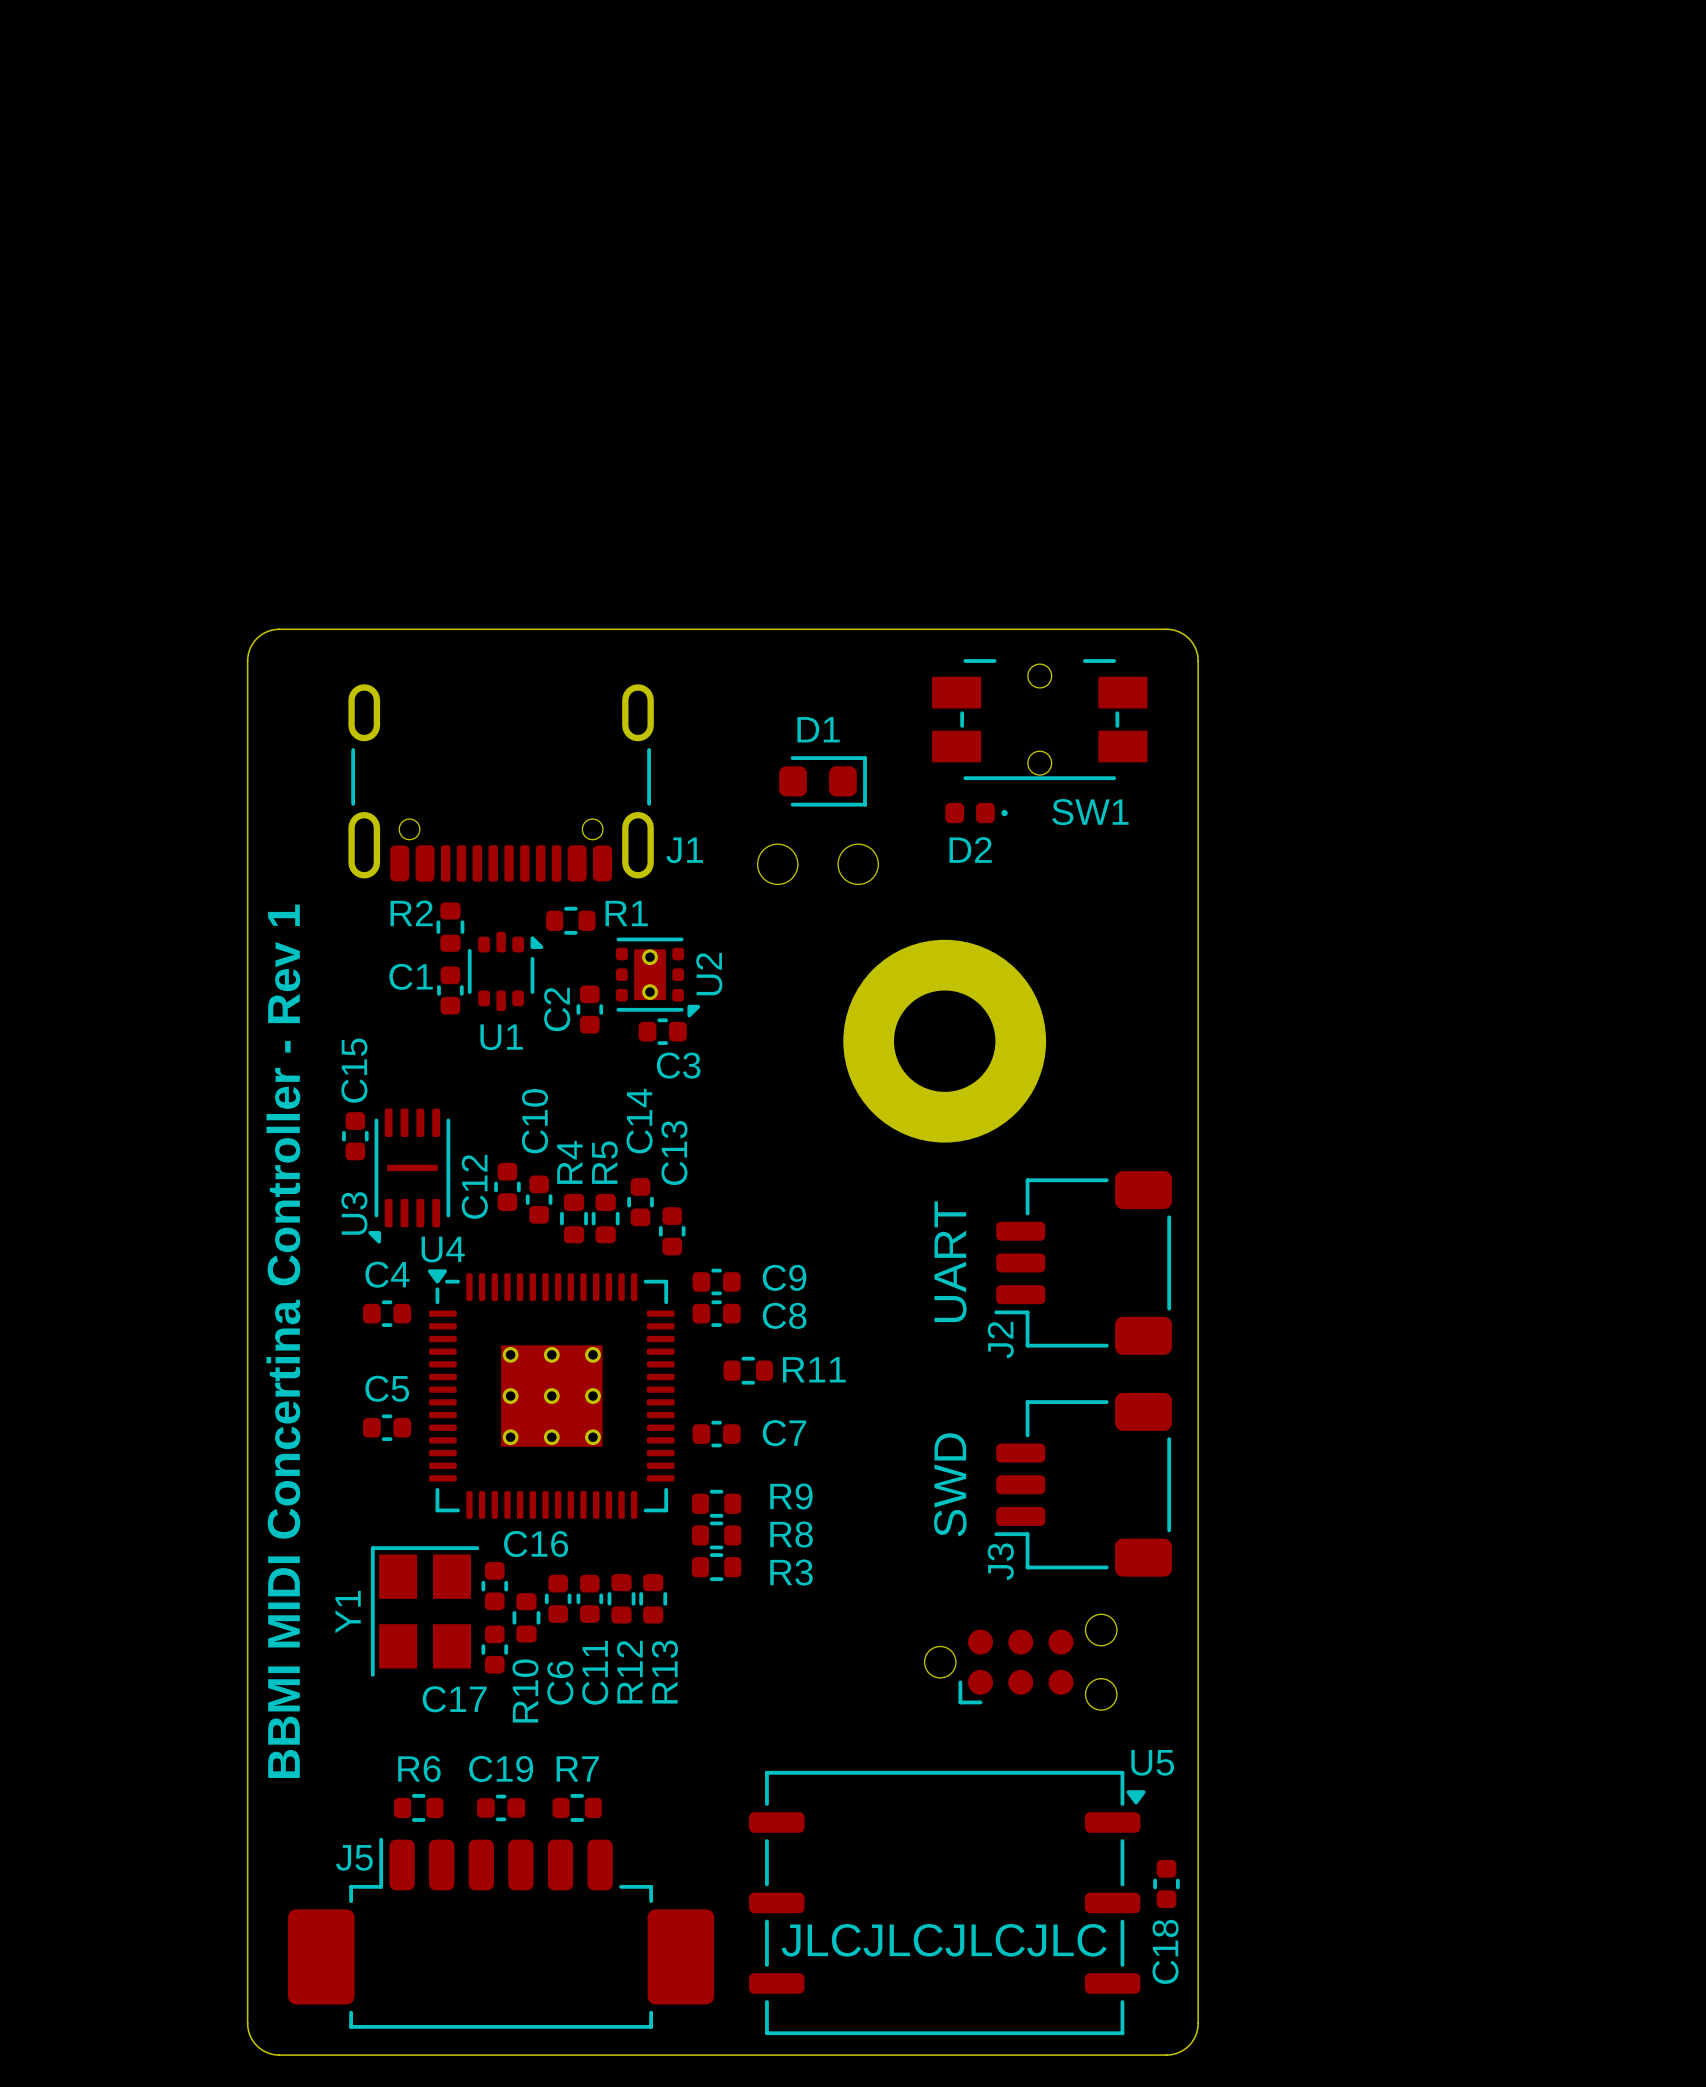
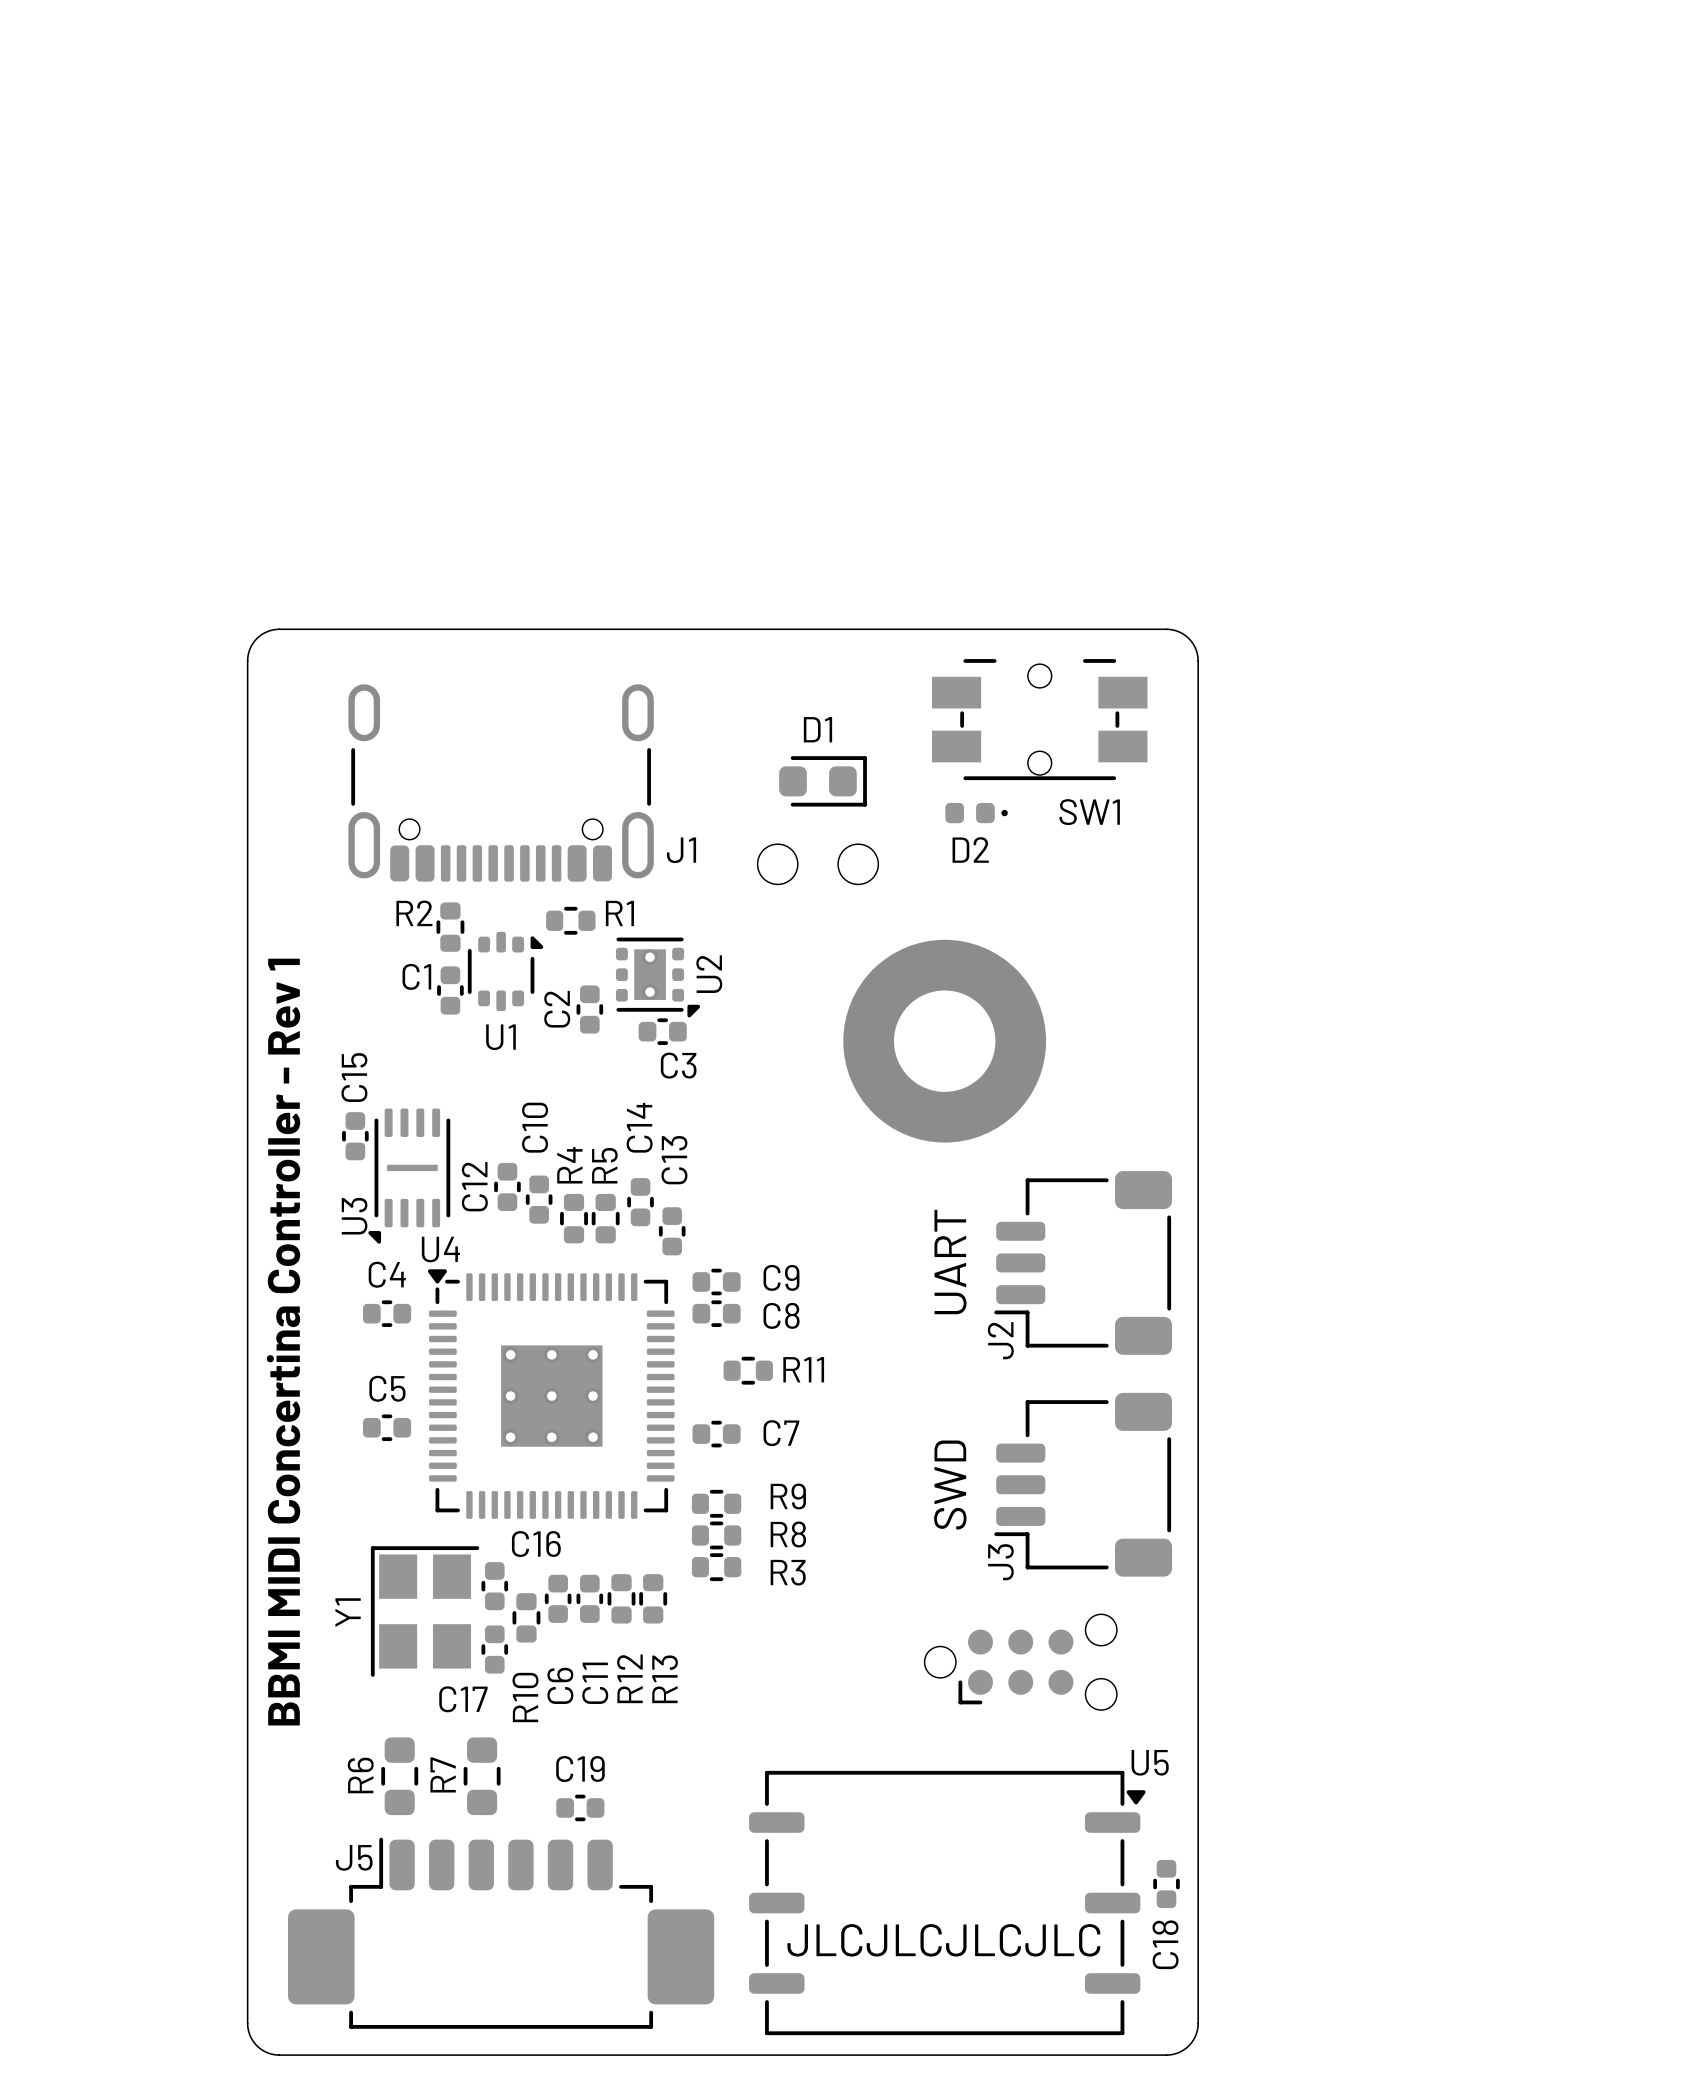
R6 footprint: [394, 1794, 444, 1822] -> [381, 1737, 419, 1816]
R7 footprint: [552, 1794, 602, 1822] -> [463, 1737, 501, 1816]
C19 position: (501, 1807) -> (580, 1807)

